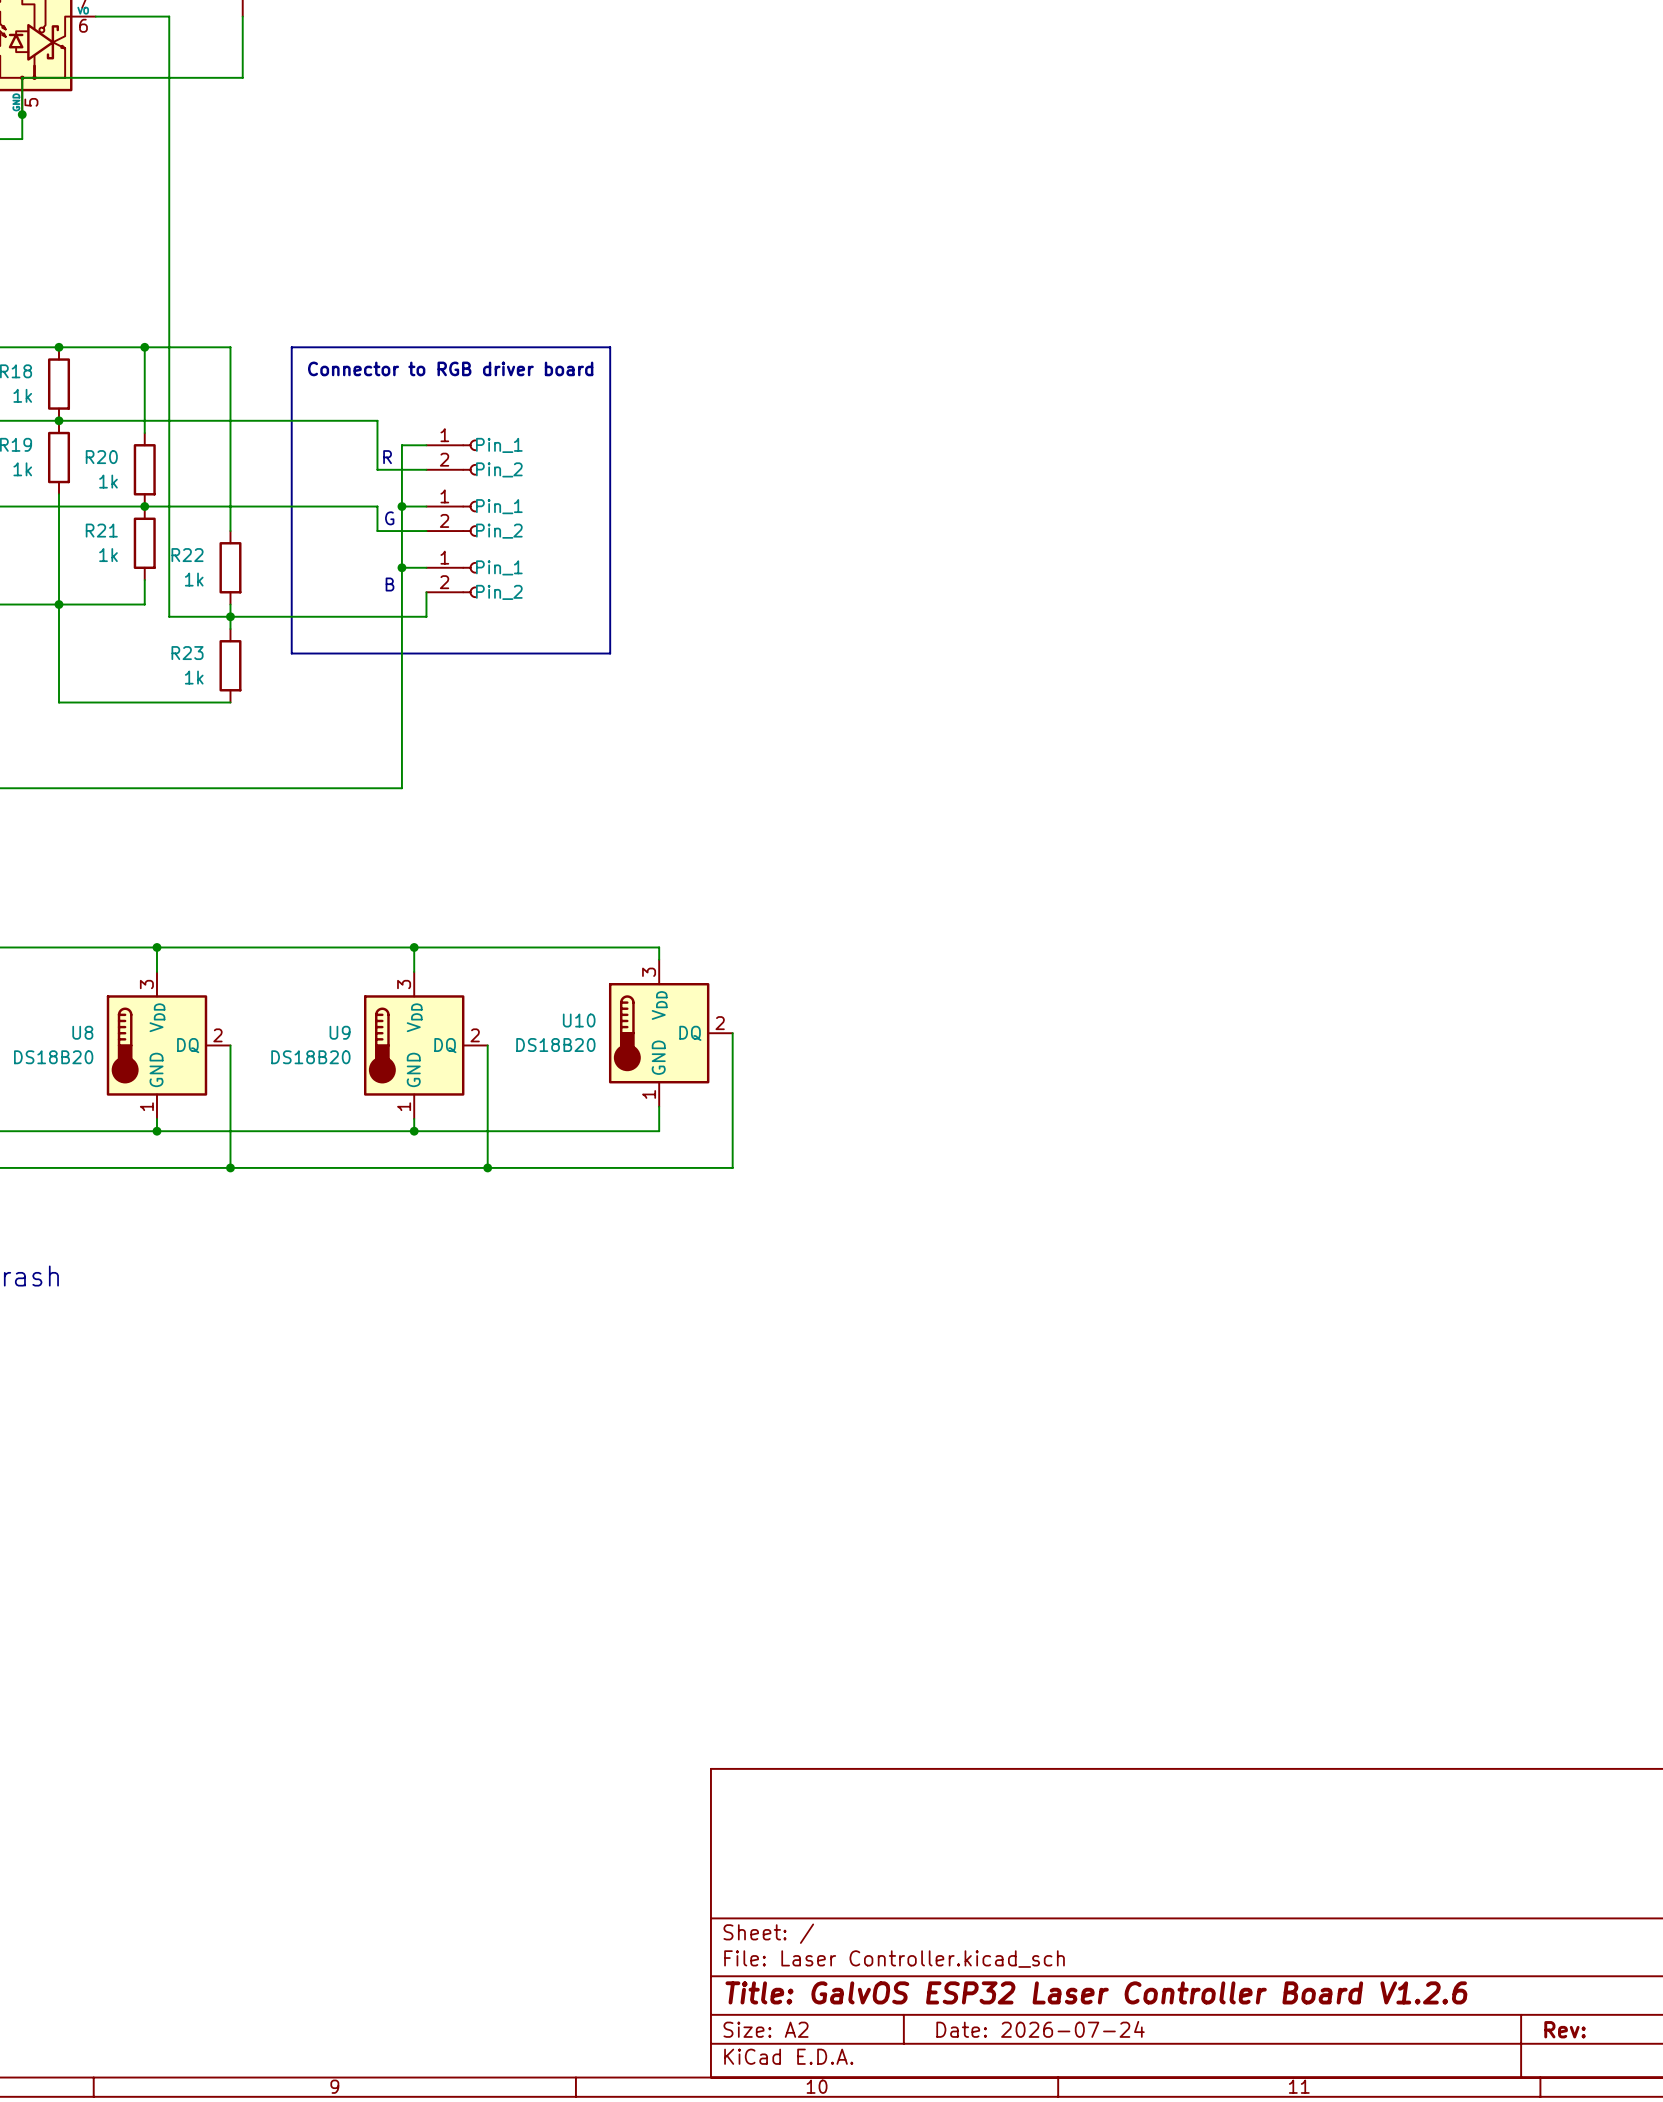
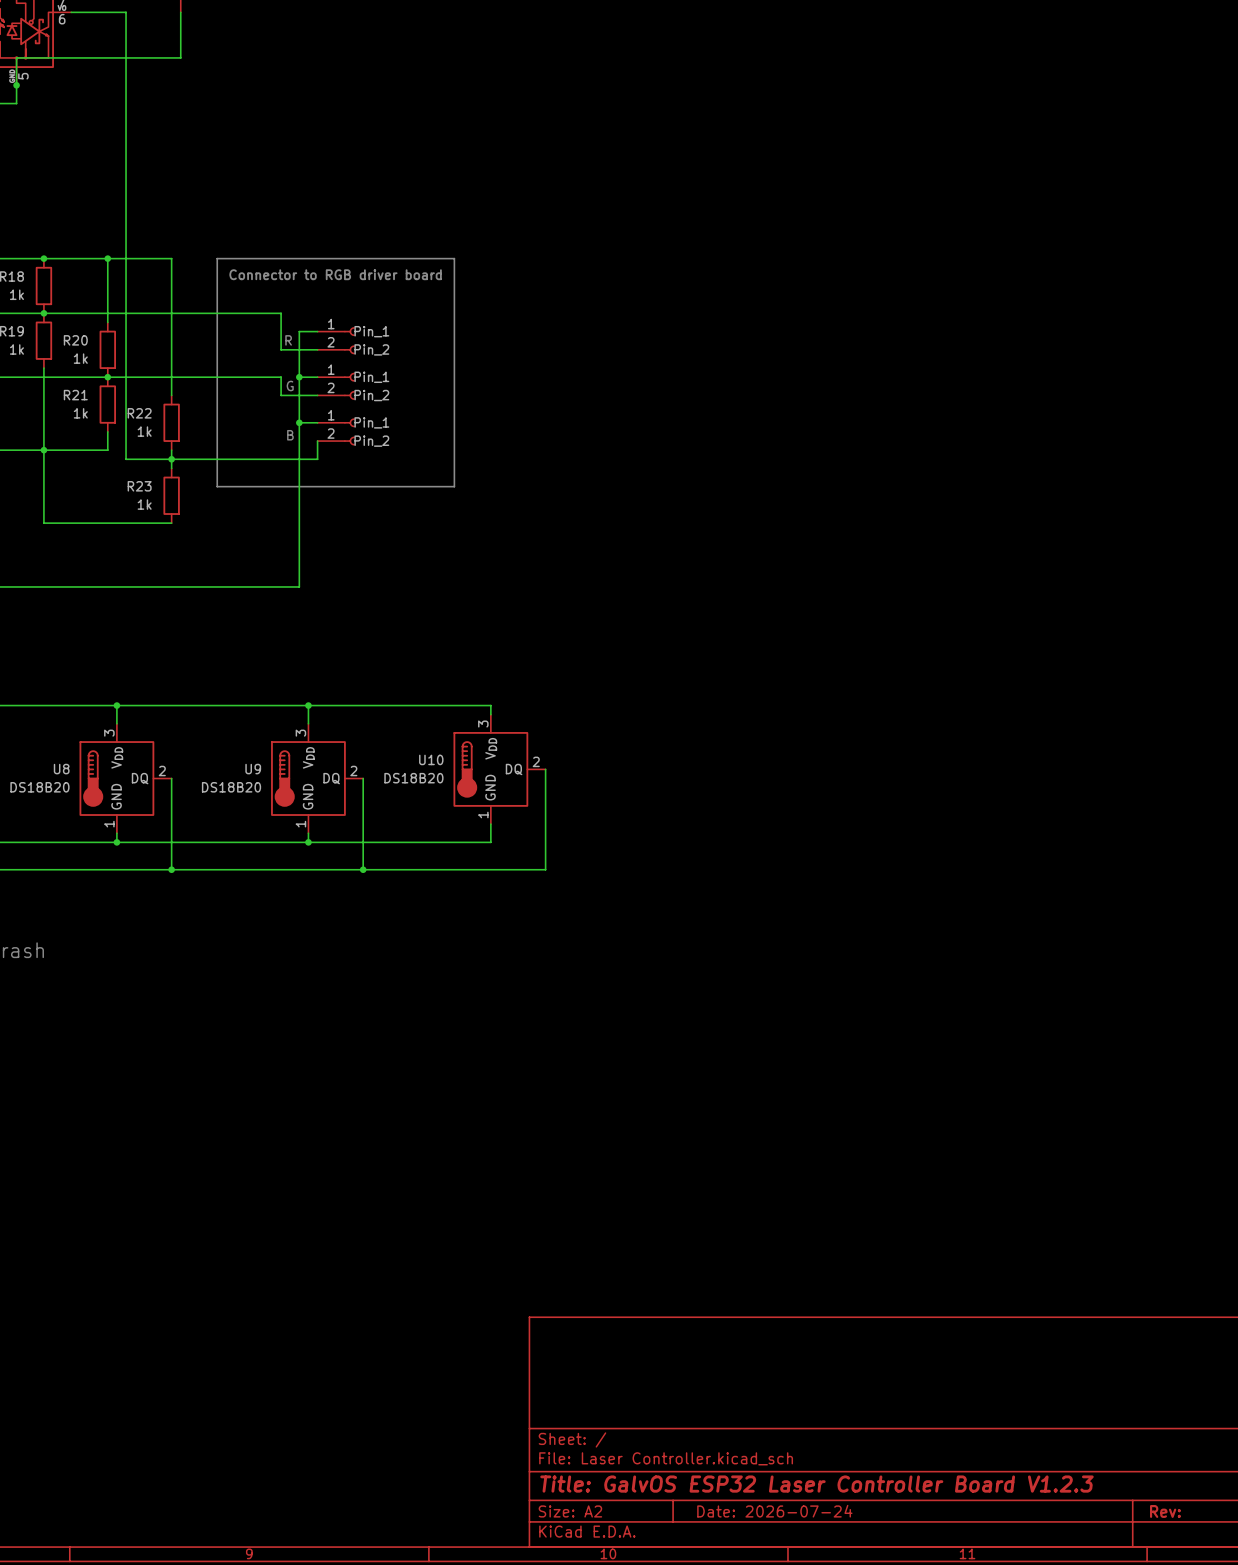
title block: Title: GalvOS ESP32 Laser Controller Board V1.2.6 (1096, 1992) -> Title: GalvOS ESP32 Laser Controller Board V1.2.3 (816, 1484)

